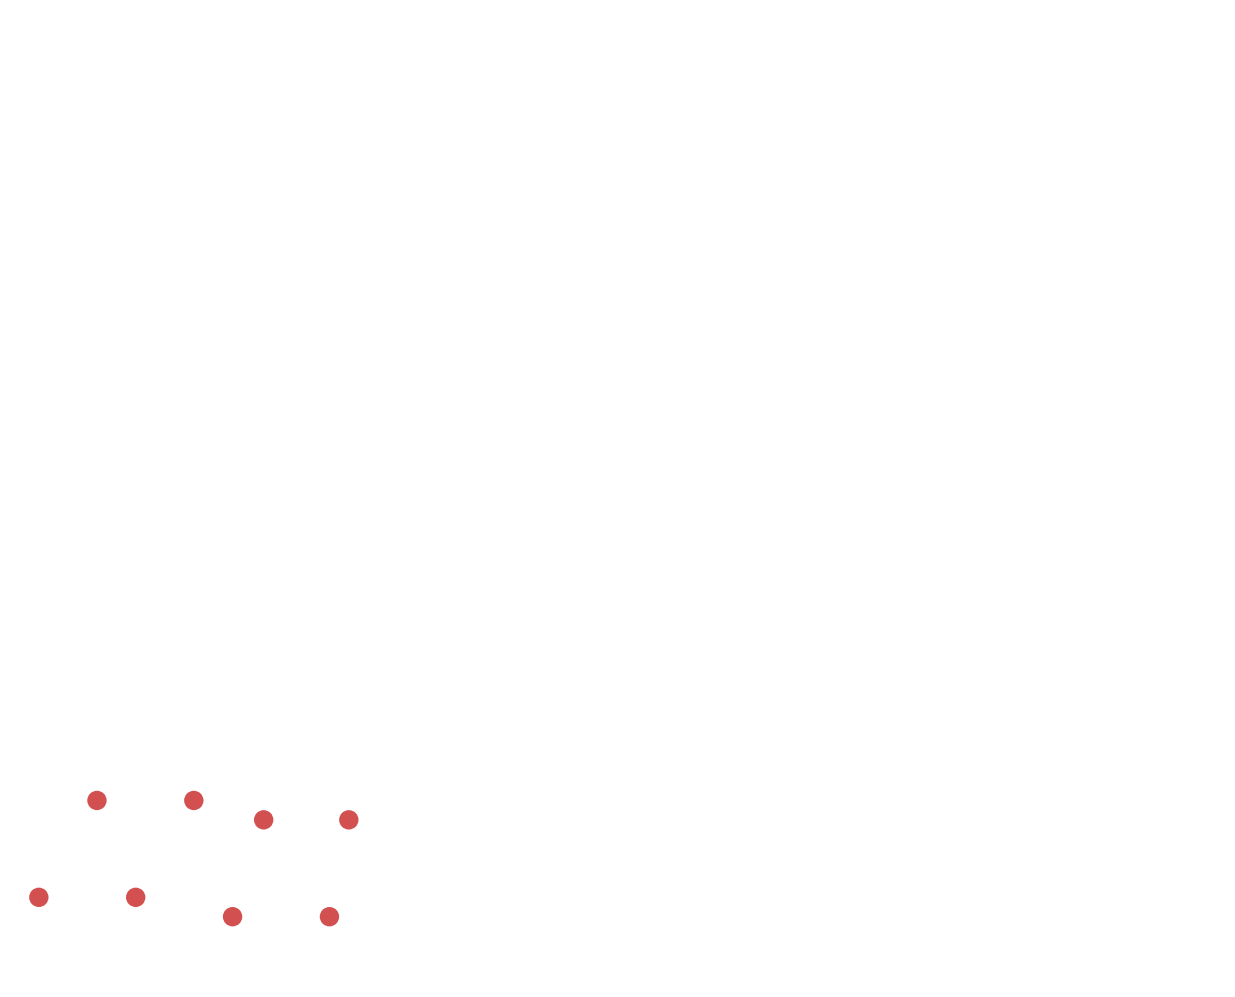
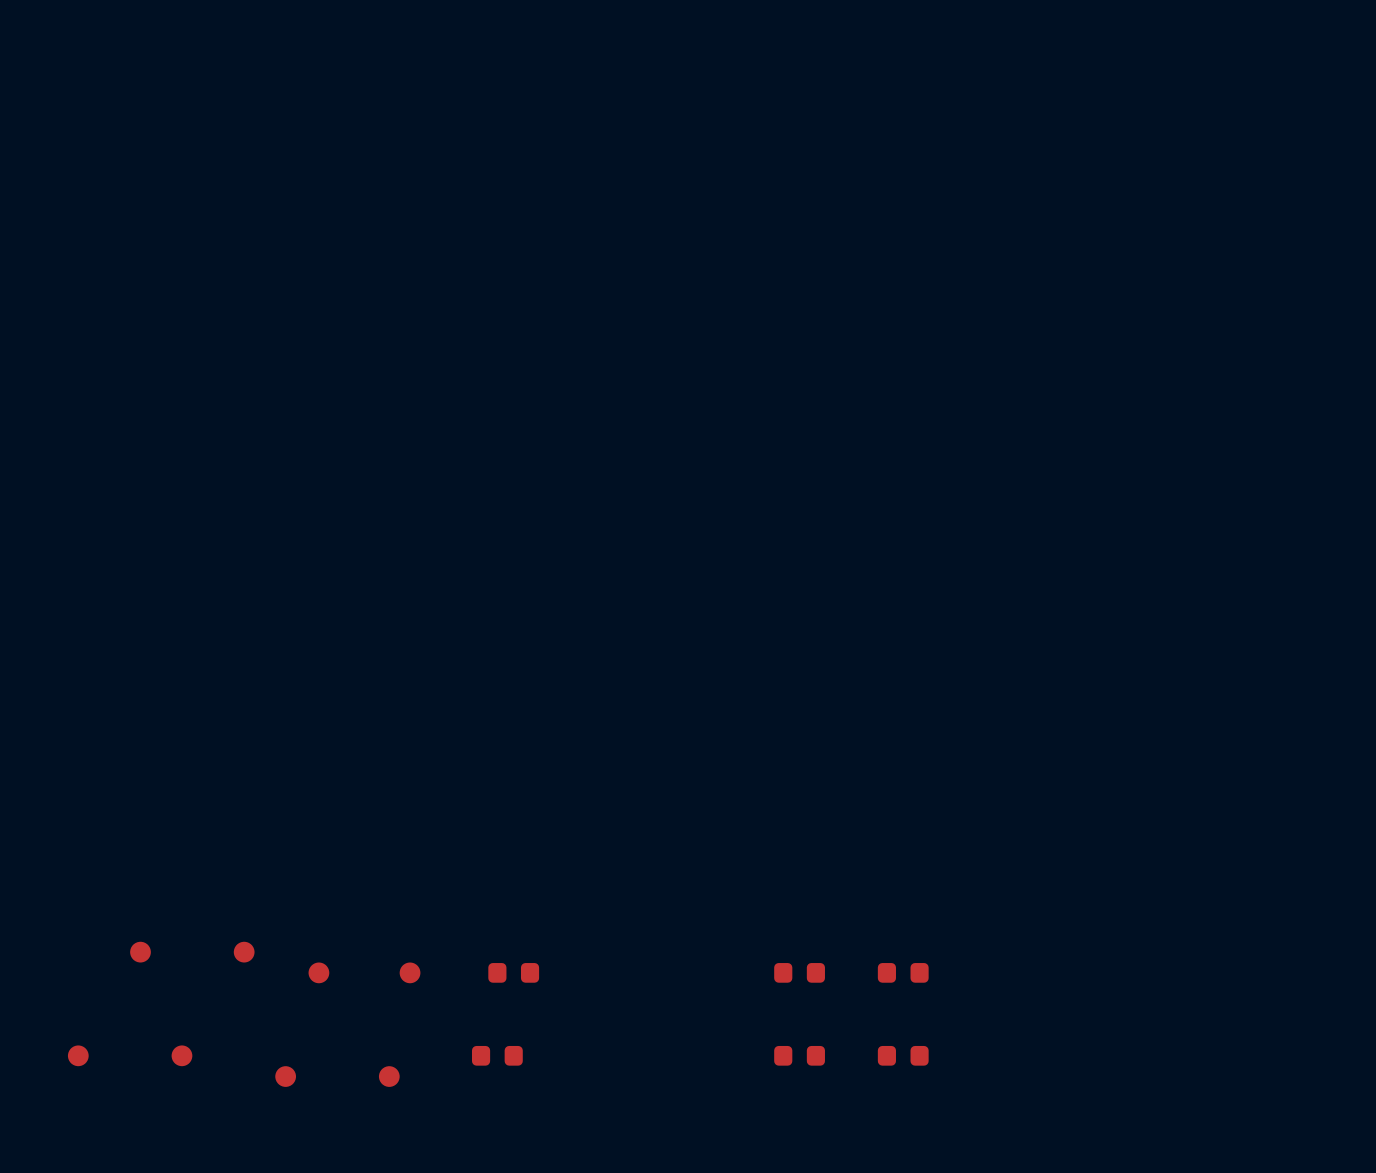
part: none -> (513, 972)
part: none -> (799, 972)
part: none -> (903, 972)
part: none -> (497, 1055)
part: none -> (799, 1055)
part: none -> (903, 1055)

